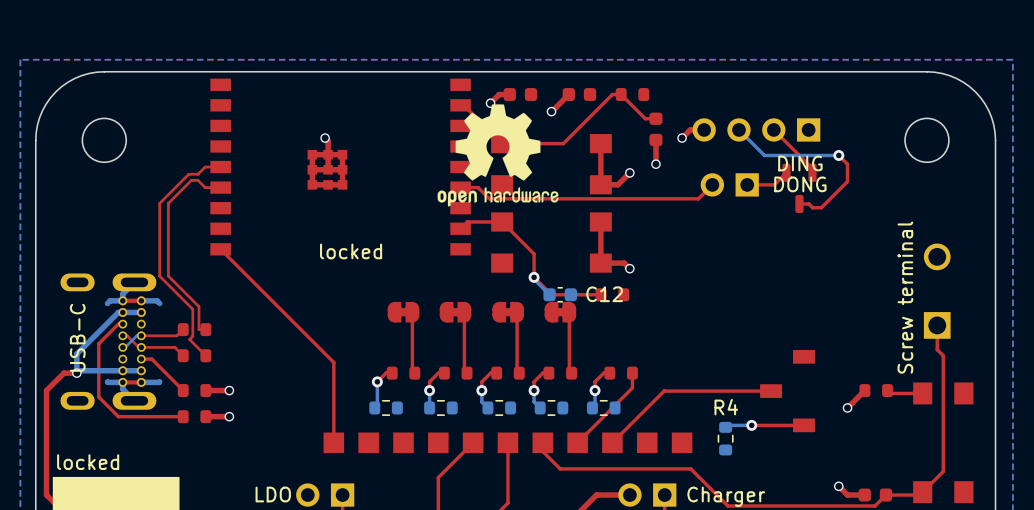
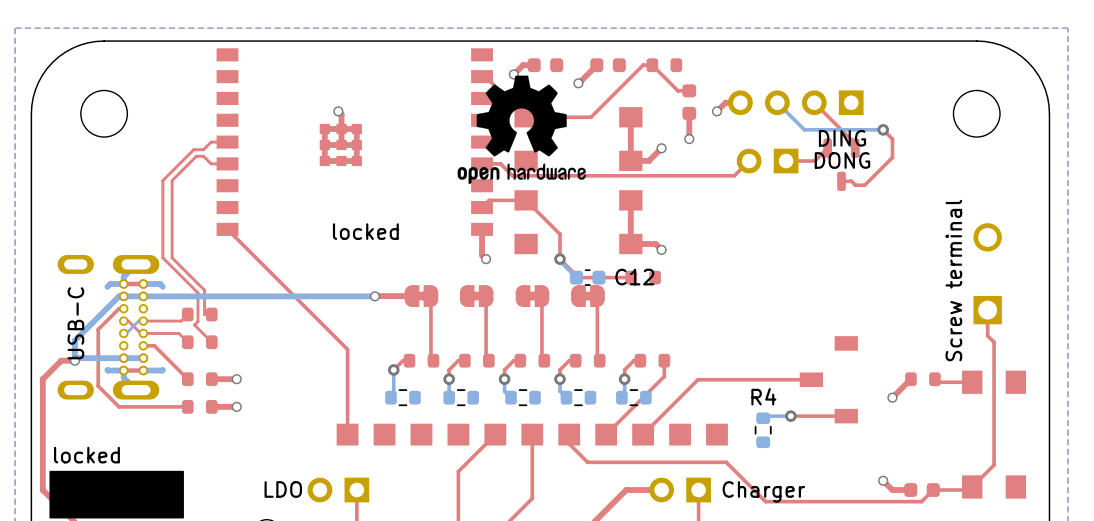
top track: none -> (482, 229) (482, 255) (486, 259)
via: none -> (486, 259)
bottom track: none -> (375, 296) (143, 296)
via: none -> (374, 296)
top track: none -> (412, 296) (374, 296)

